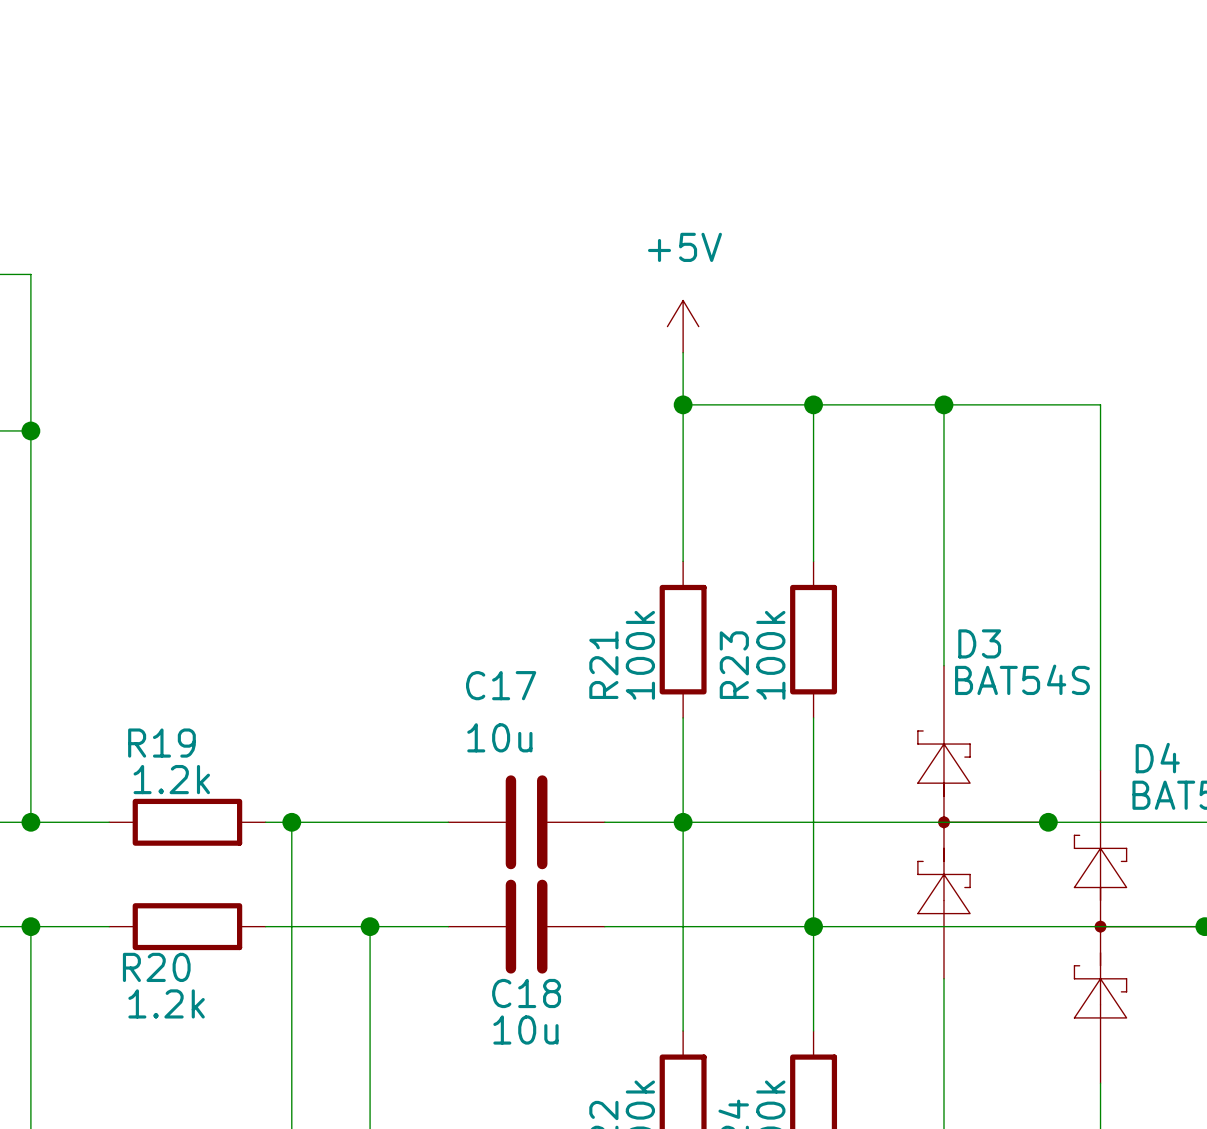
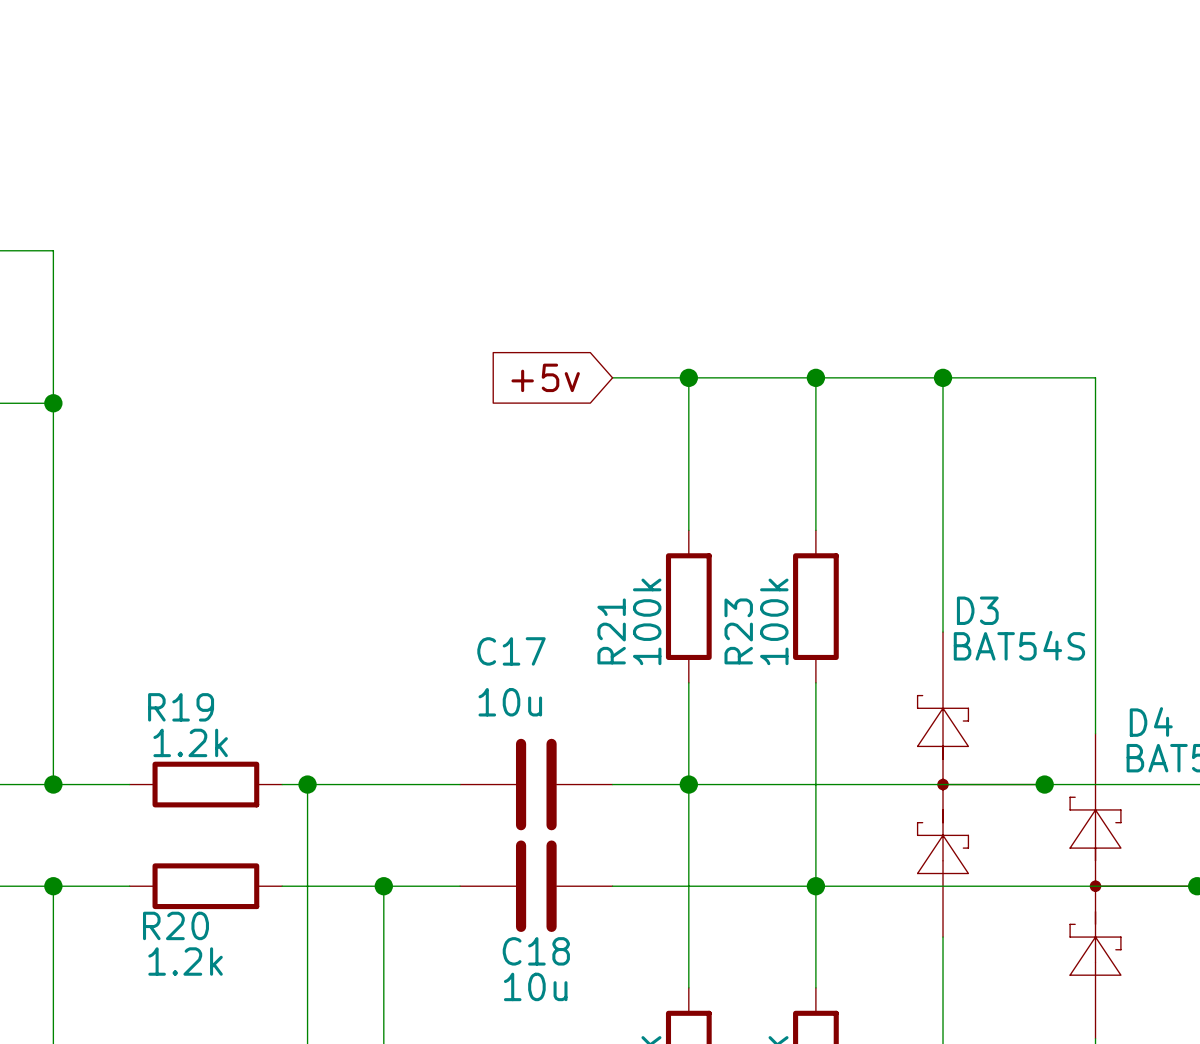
power symbol: +5V (683, 326) -> none
wire: (683, 352) (683, 404) -> (612, 377) (688, 377)
global label: none -> +5v (545, 377)

